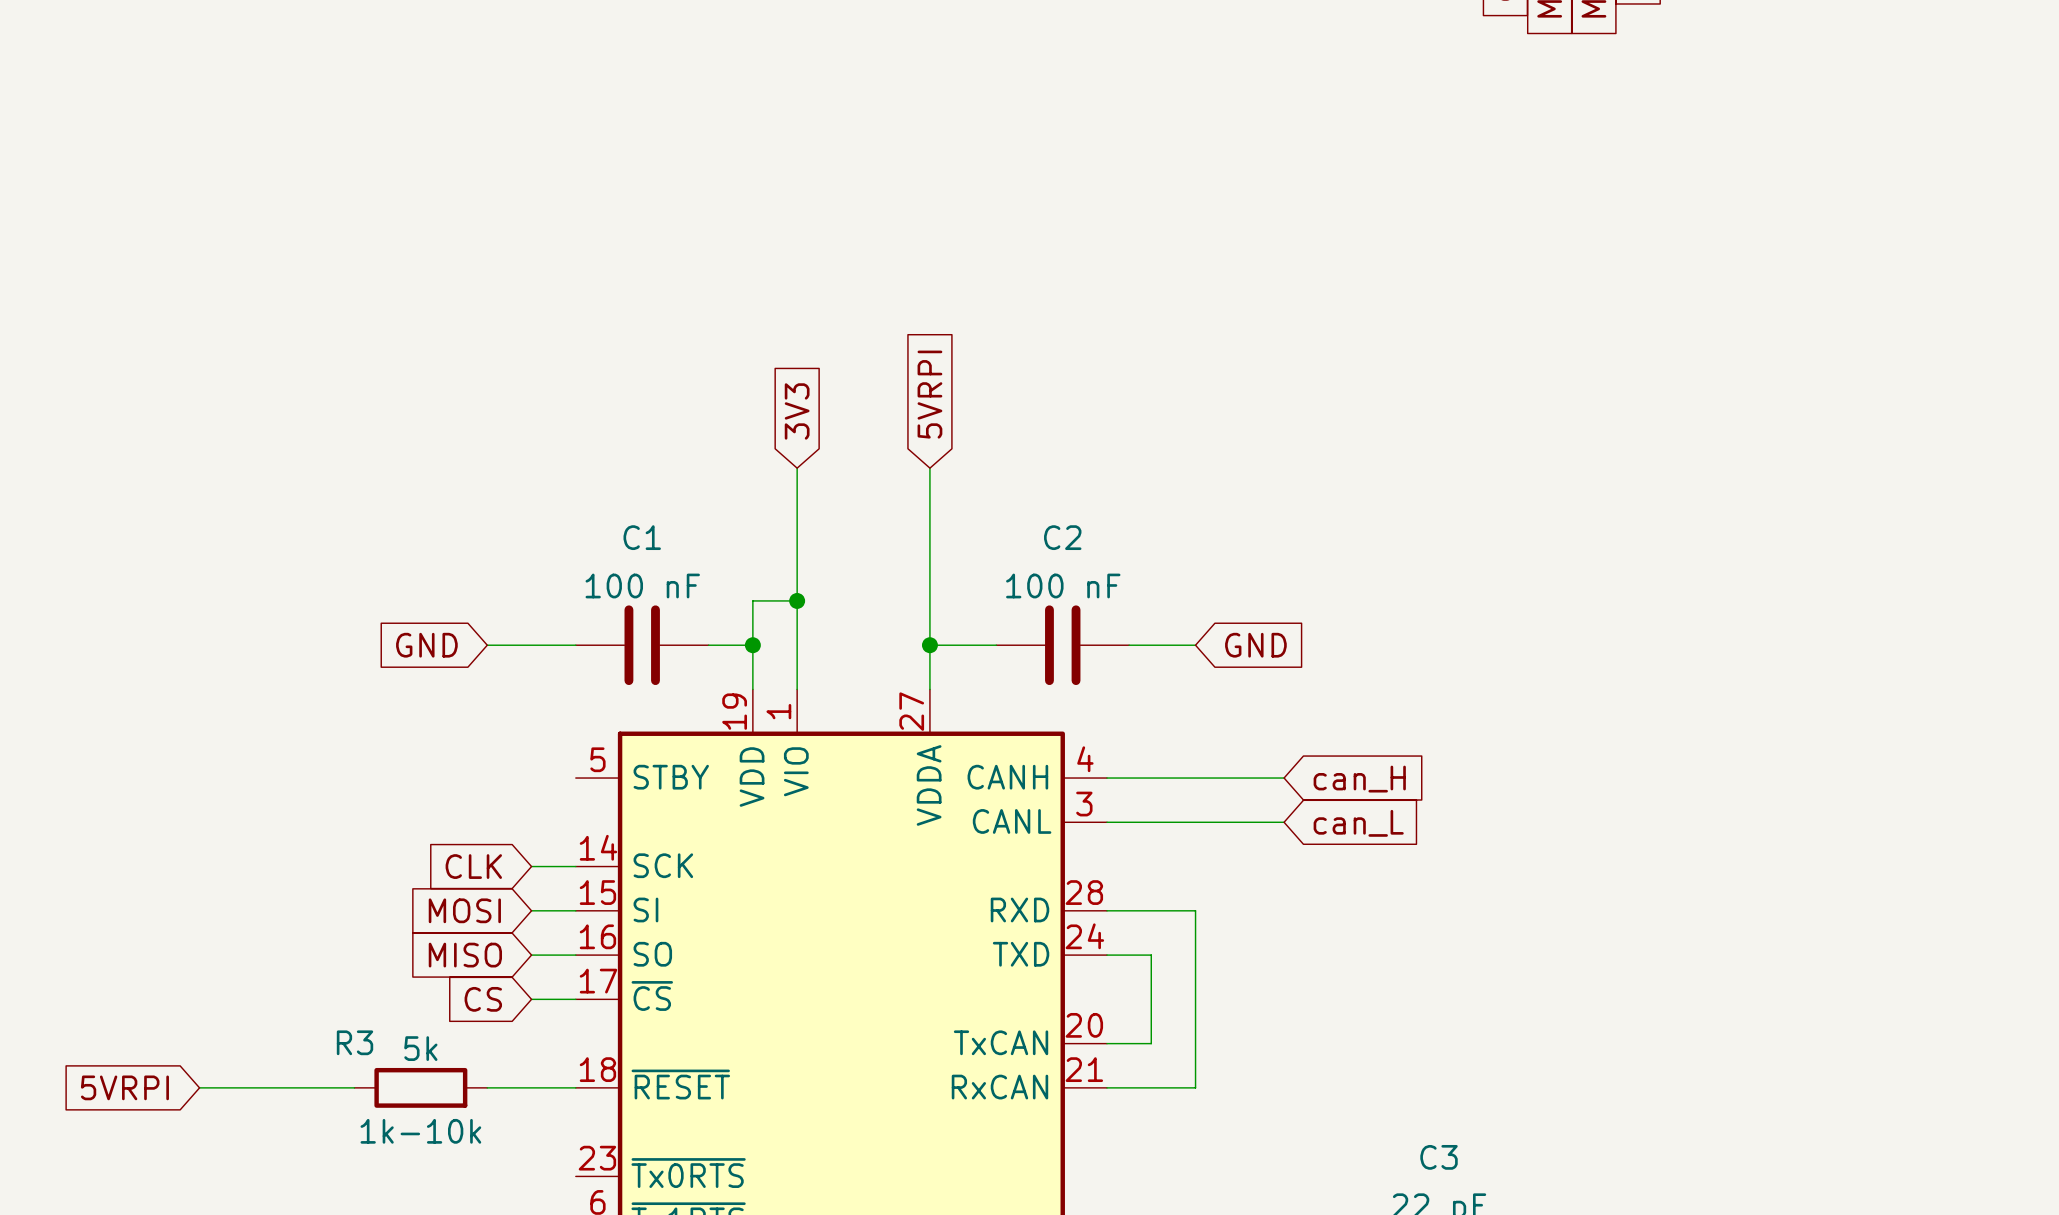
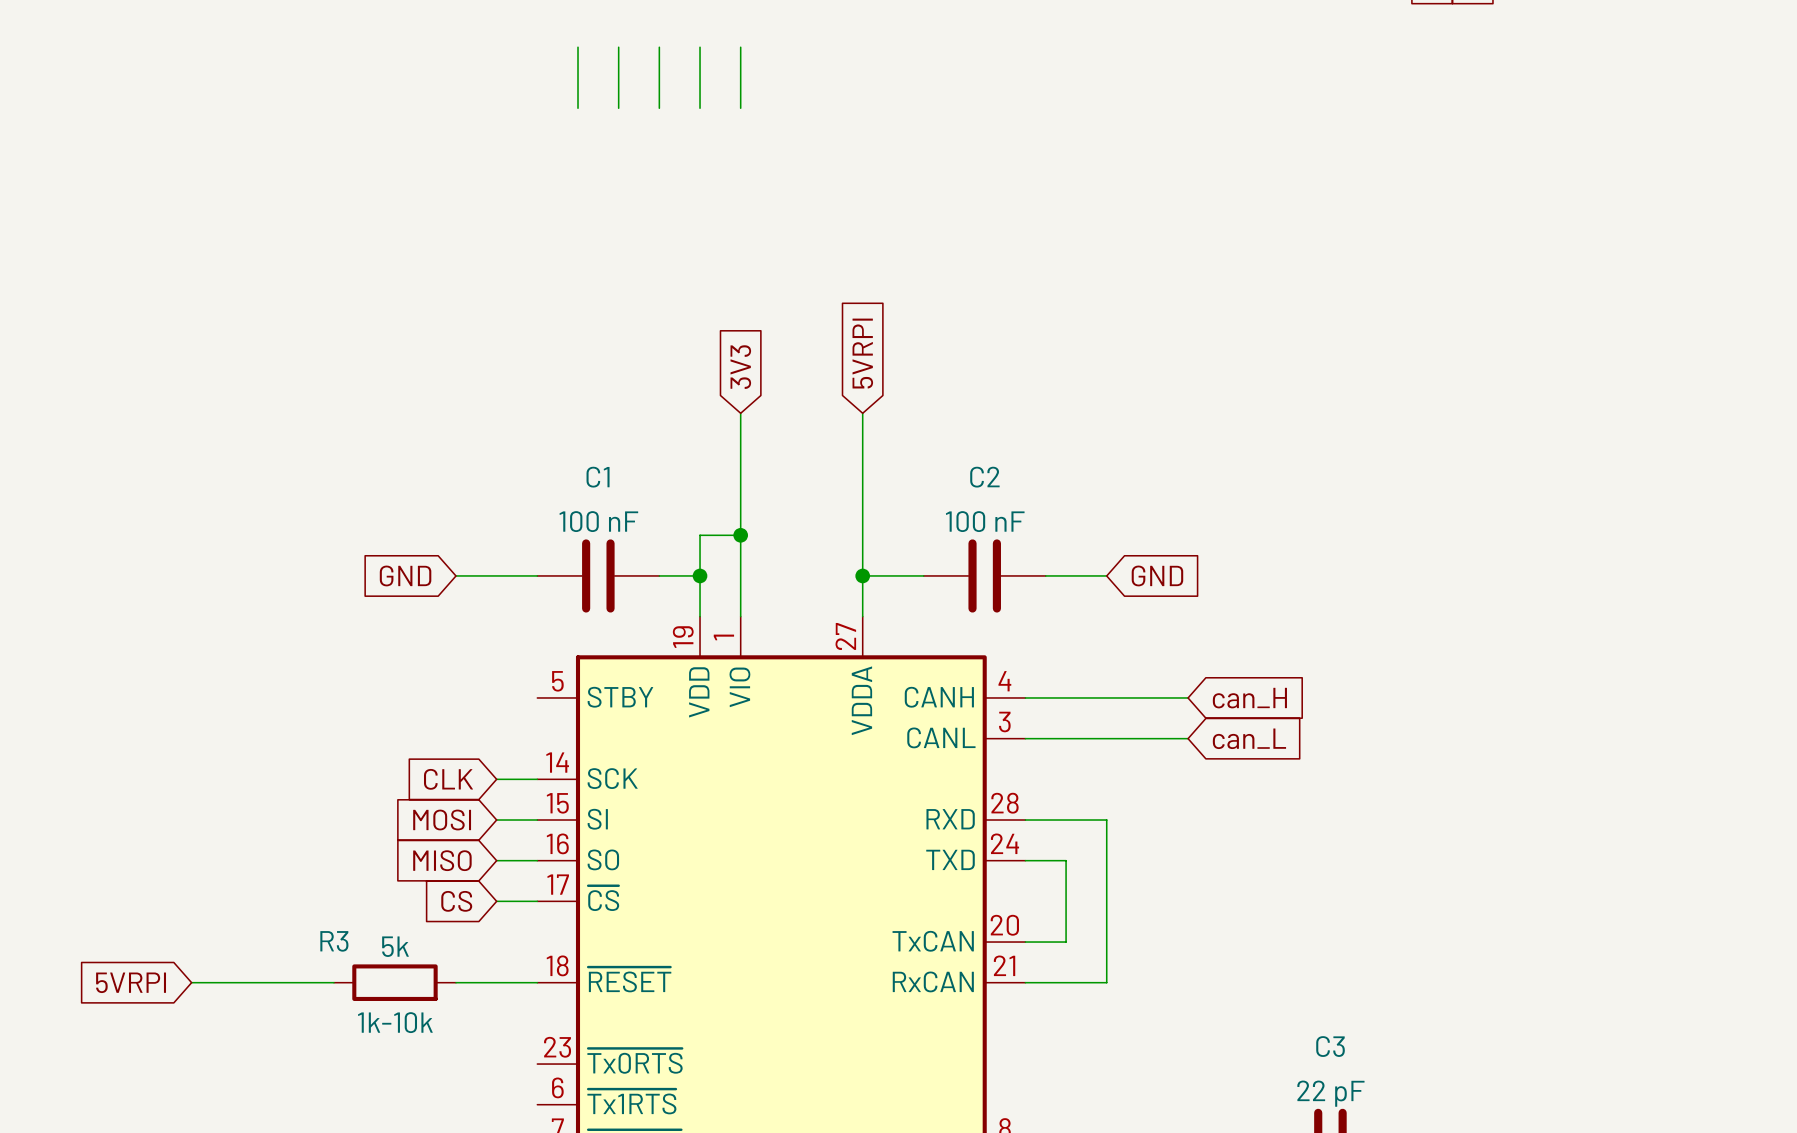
wire: none -> (578, 47) (578, 108)
wire: none -> (618, 47) (618, 108)
wire: none -> (659, 47) (659, 108)
wire: none -> (700, 47) (700, 108)
wire: none -> (740, 47) (740, 108)

